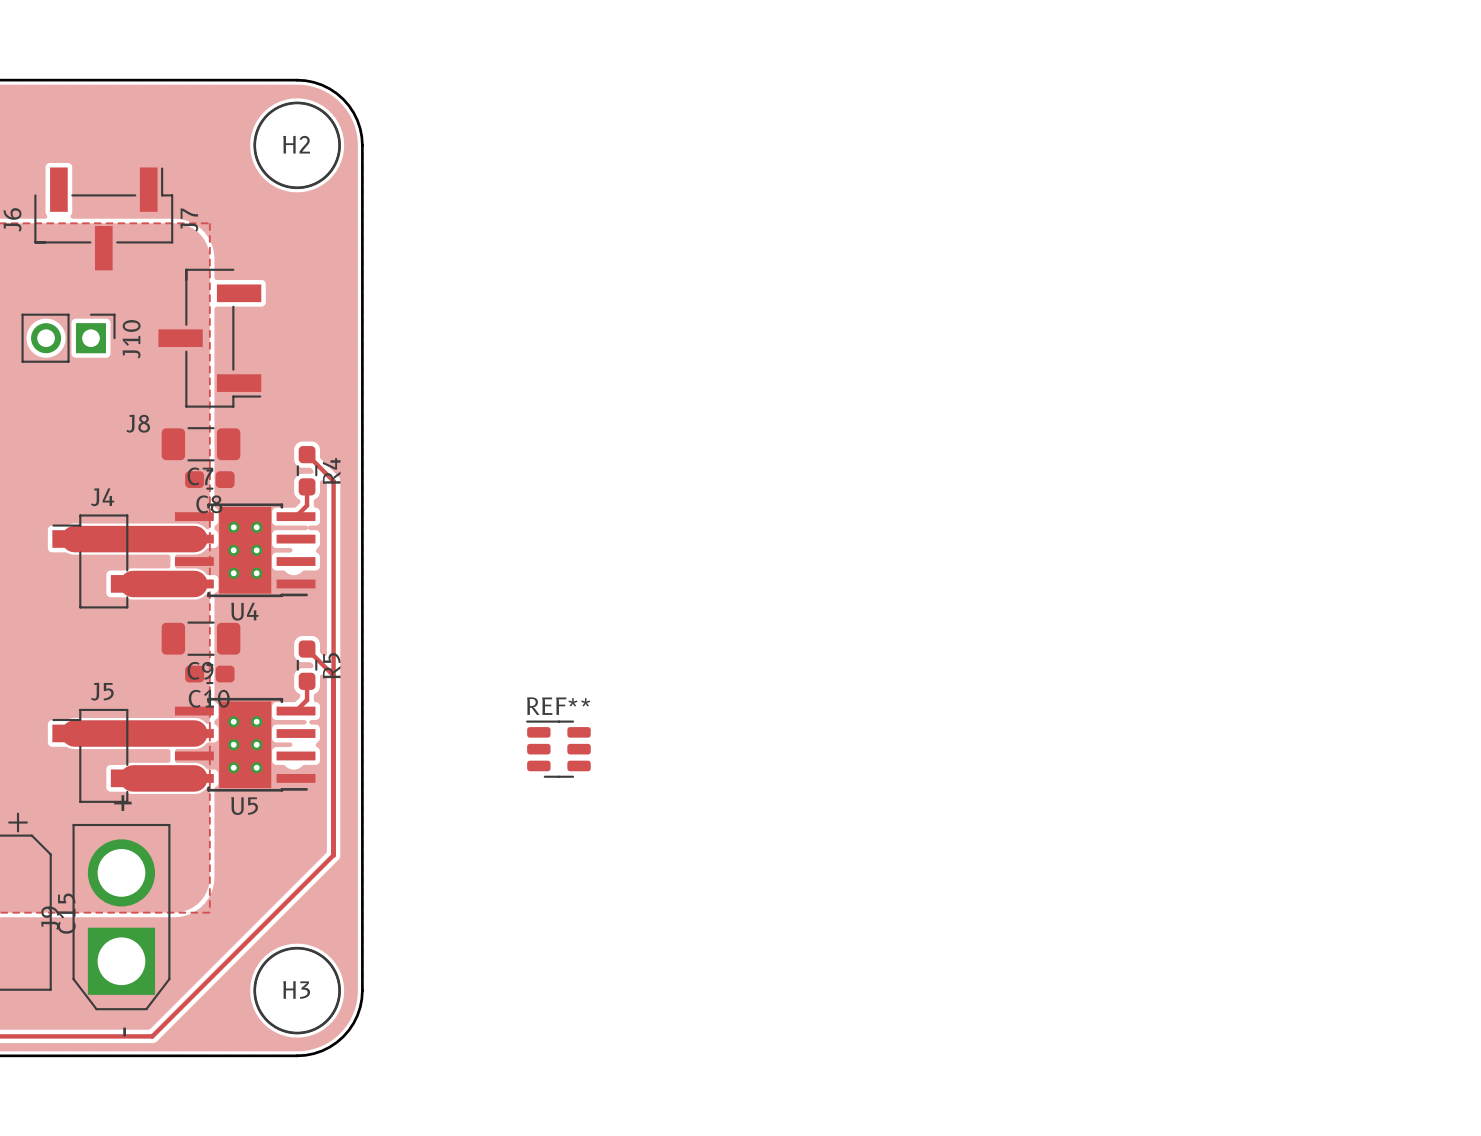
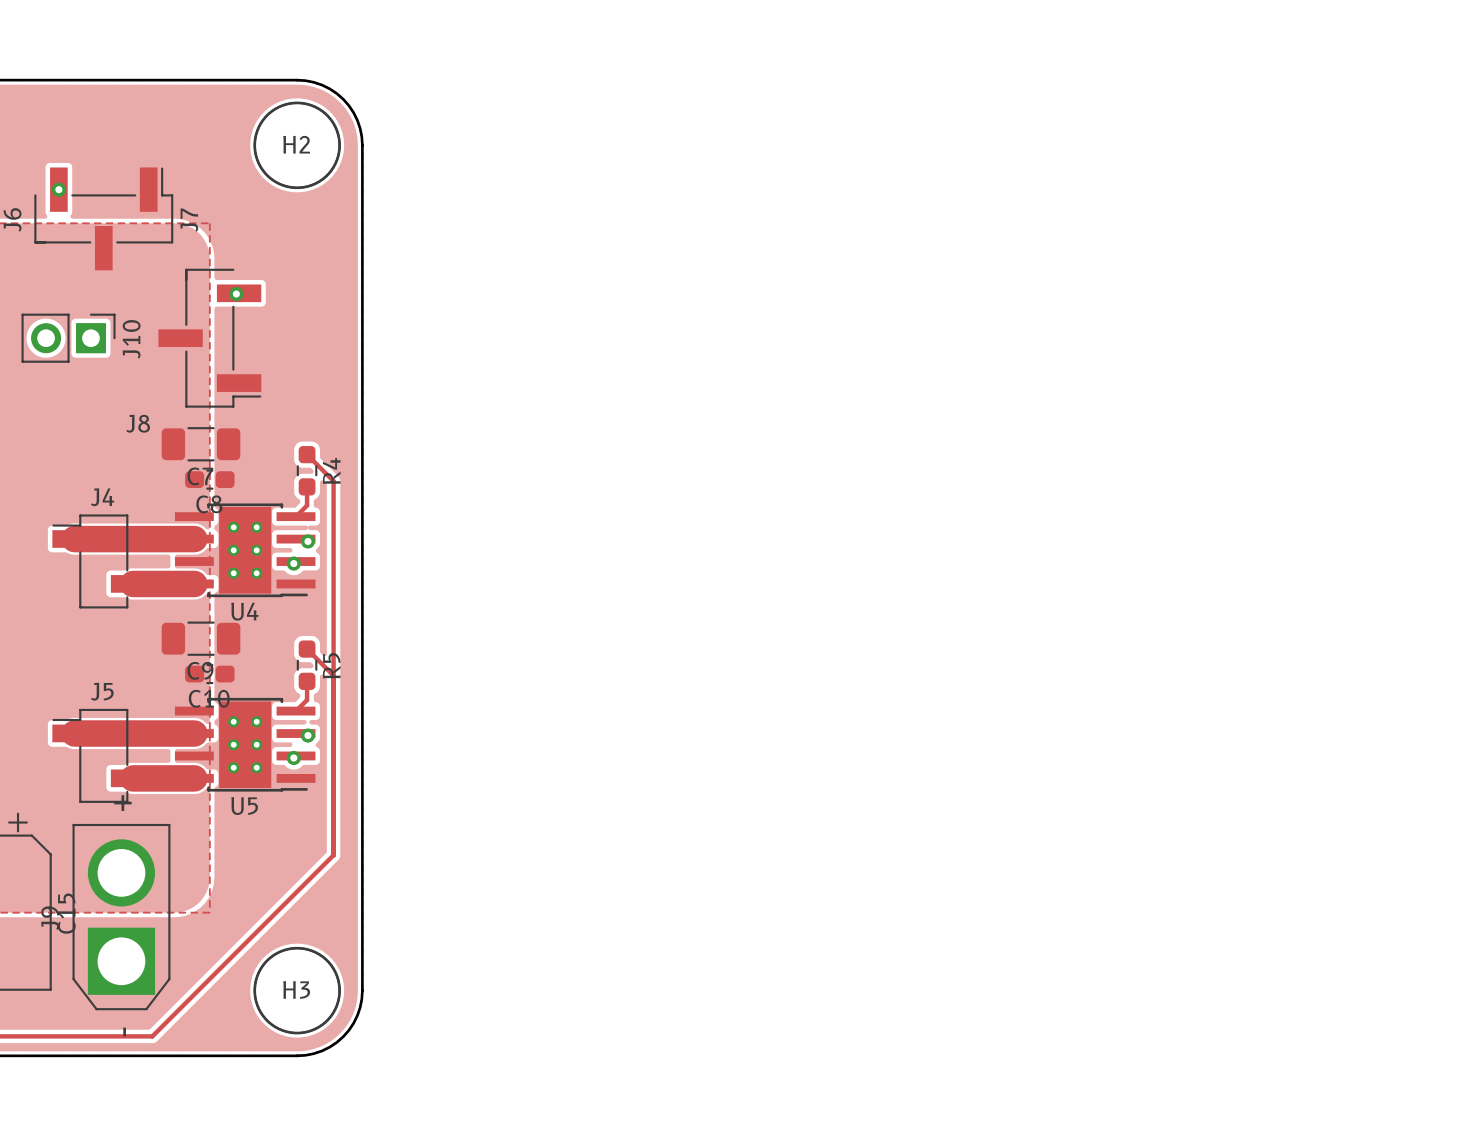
via: none -> (58, 189)
via: none -> (236, 294)
via: none -> (307, 541)
via: none -> (293, 563)
via: none -> (307, 735)
REF**: (558, 749) -> none
via: none -> (293, 758)

